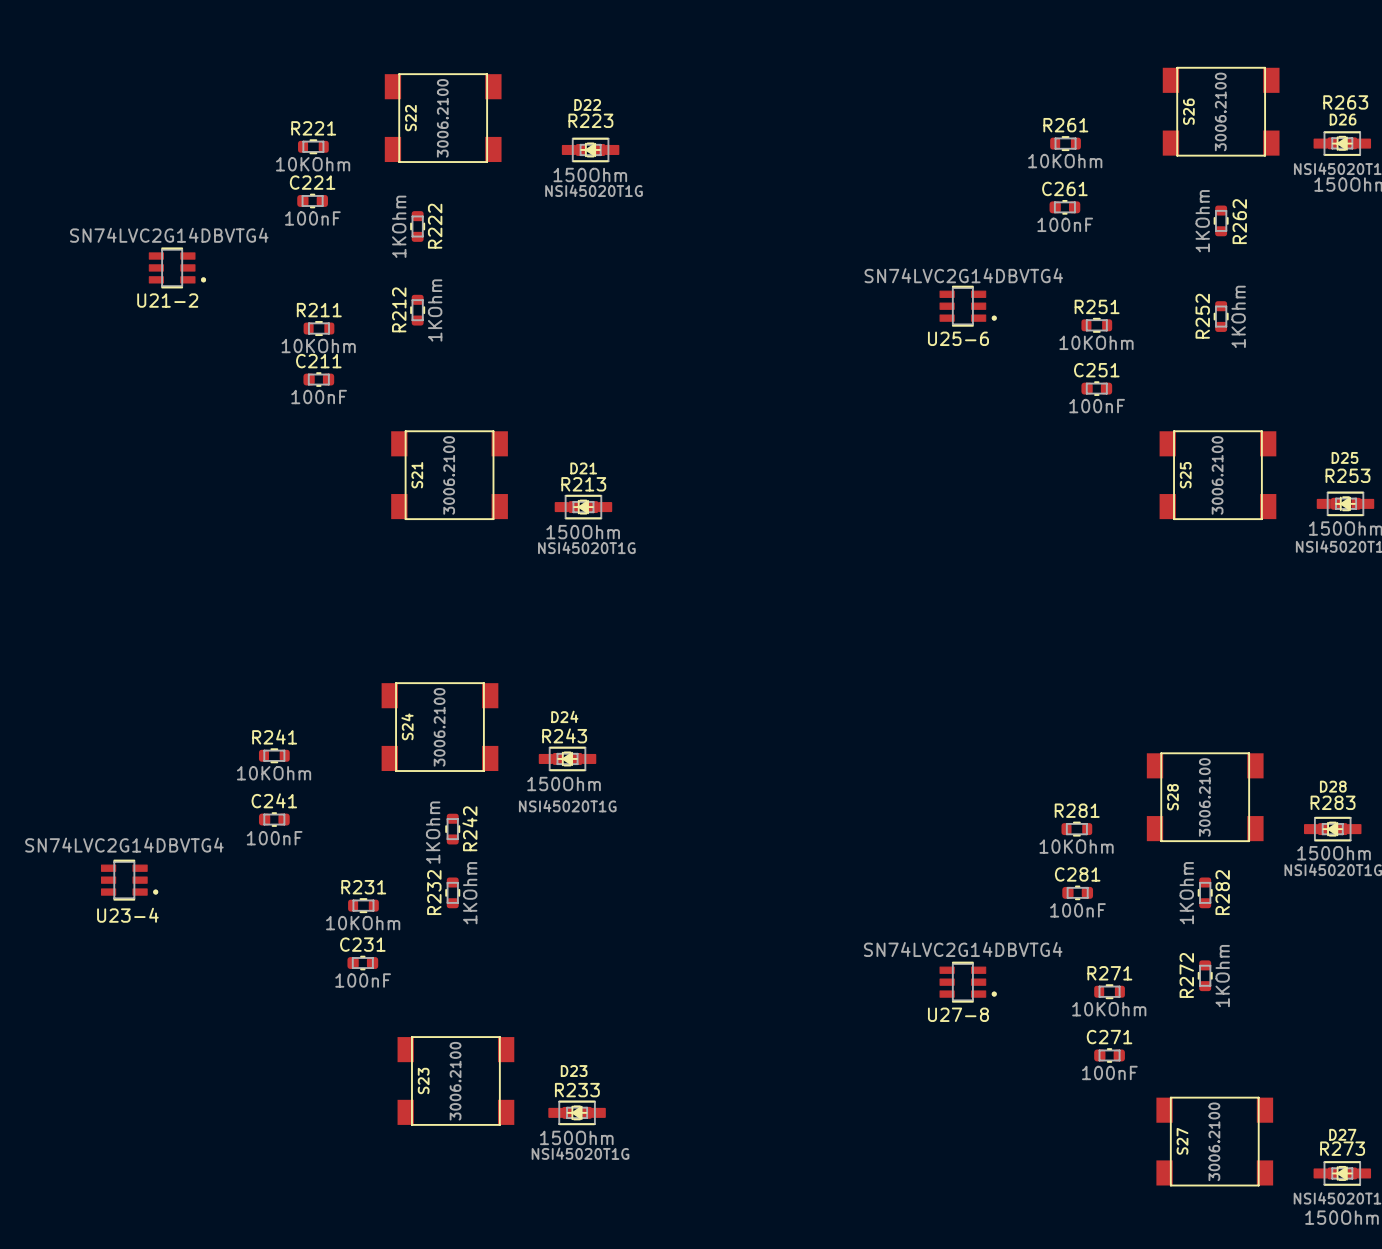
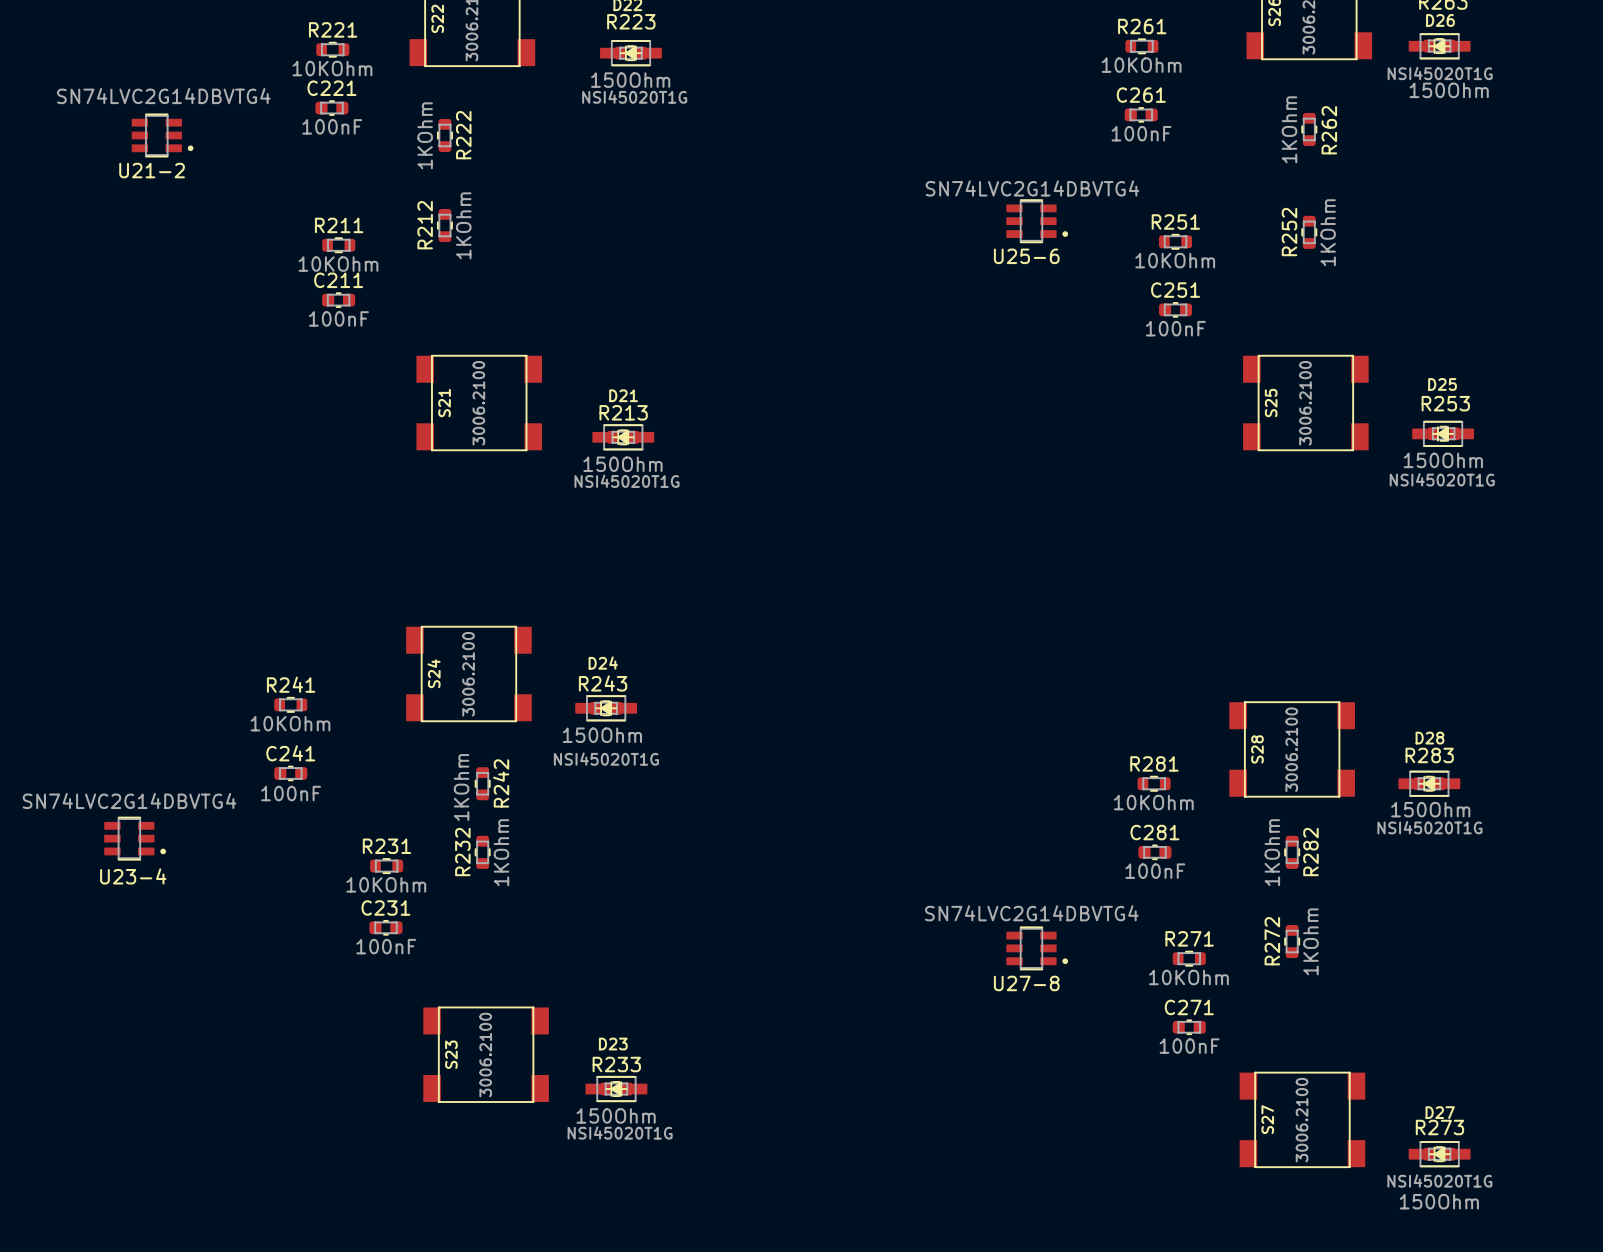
U21-2 value position: SN74LVC2G14DBVTG4 (169, 235) -> SN74LVC2G14DBVTG4 (163, 96)
U21-2 position: (177, 267) -> (162, 135)

